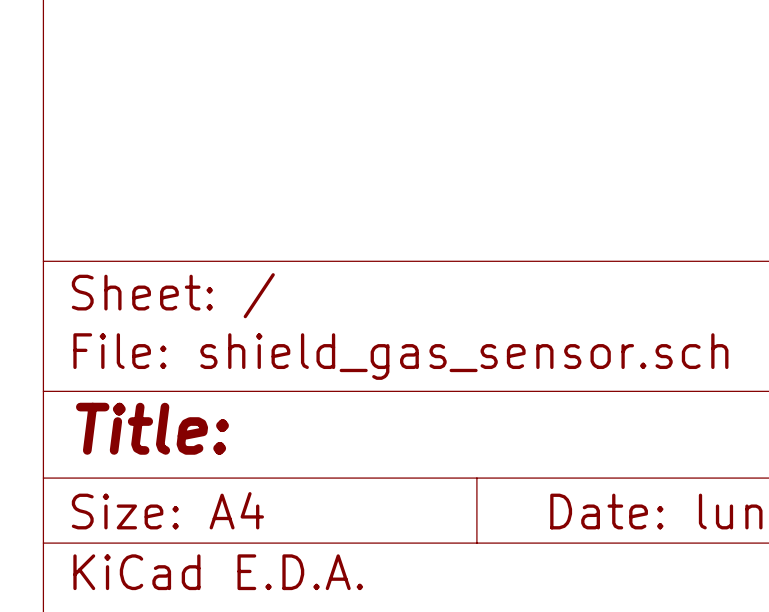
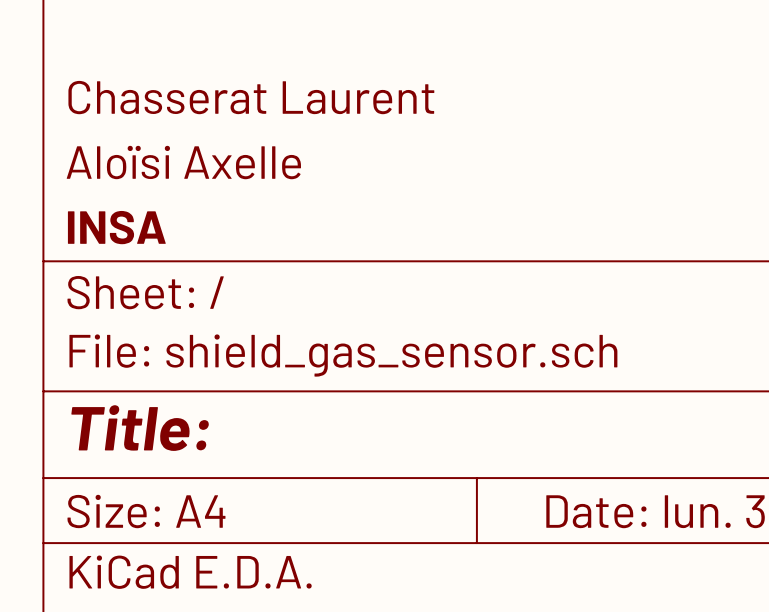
title block: none -> Chasserat Laurent (251, 97)
title block: none -> Aloïsi Axelle (183, 162)
title block: none -> INSA (116, 227)

